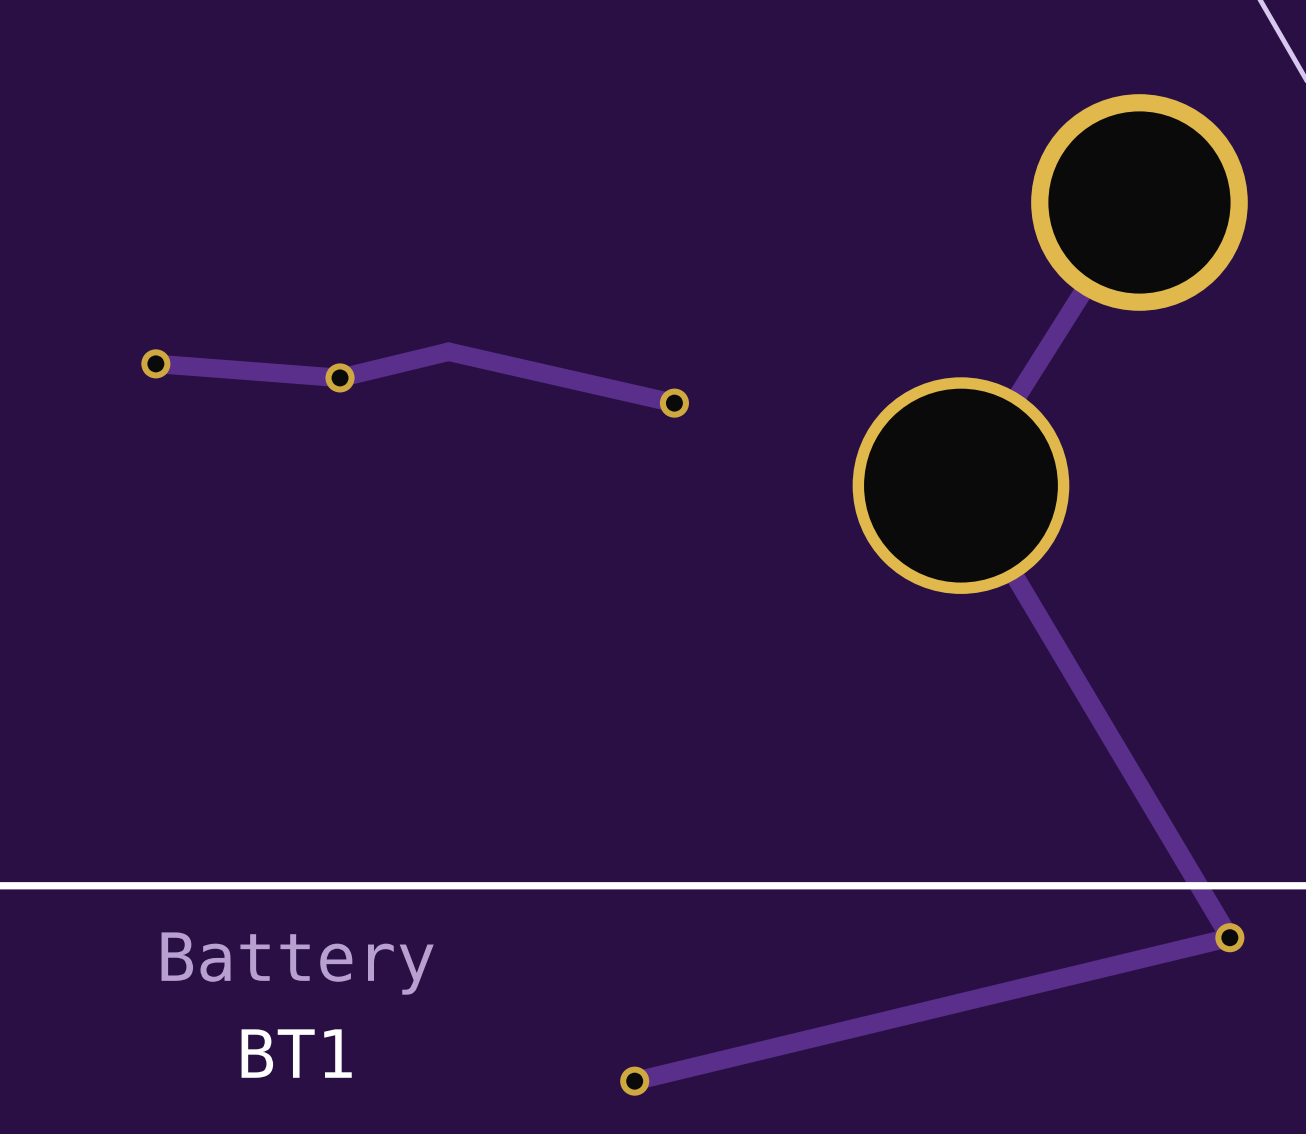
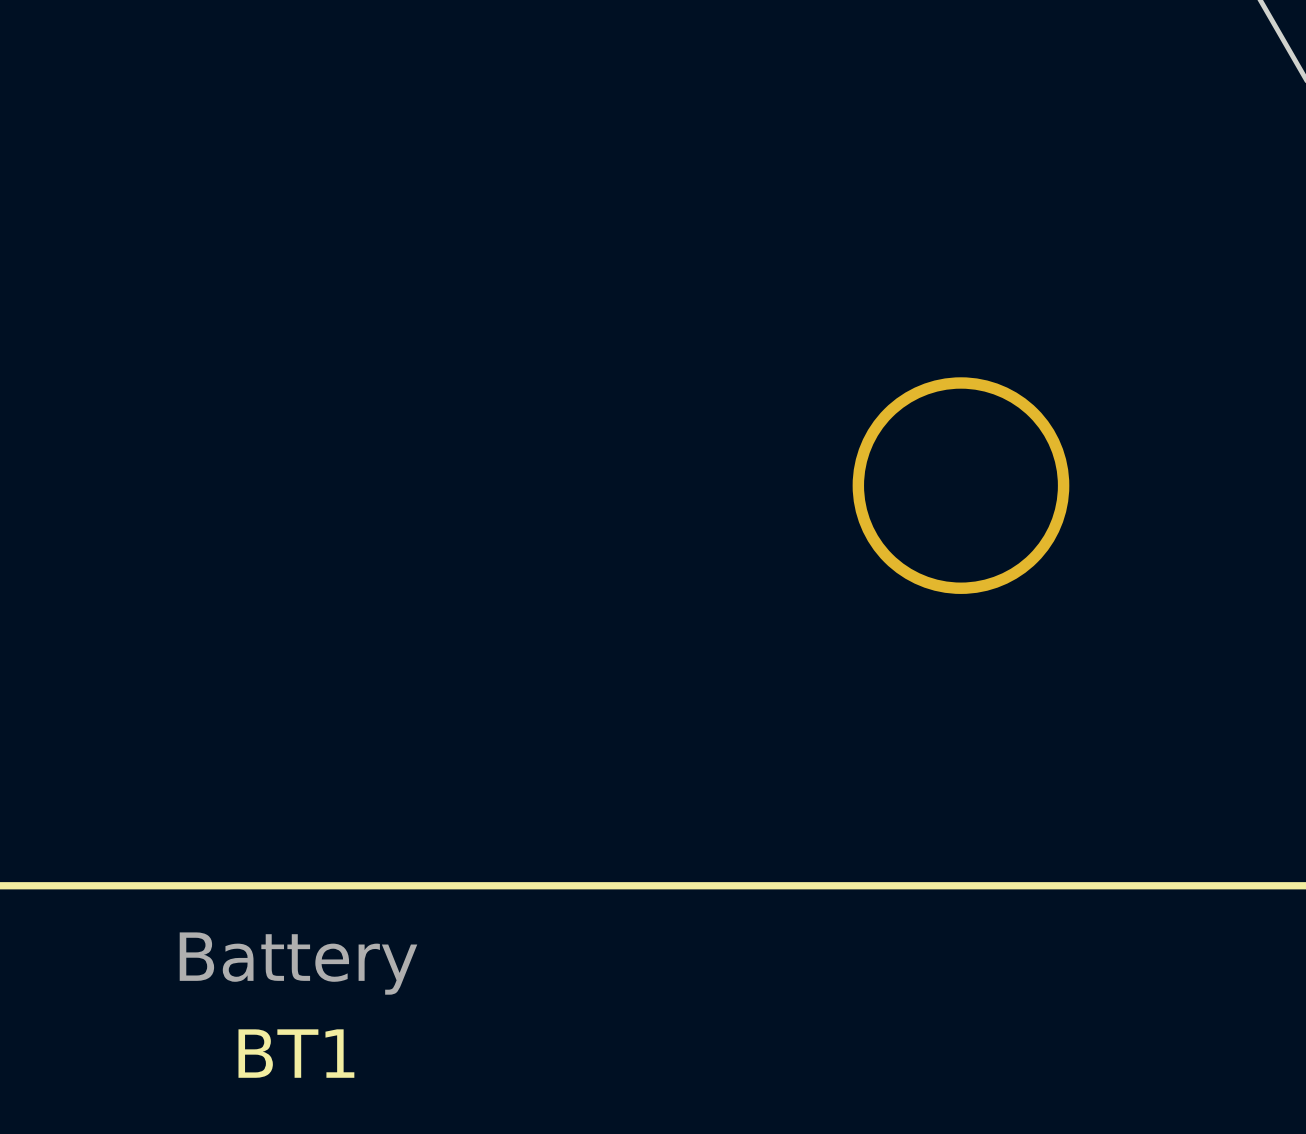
track: (1139, 202) (960, 485) (1229, 937) (634, 1081) -> none
part: (1139, 202) -> none
track: (155, 363) (340, 377) (448, 351) (674, 403) -> none
via: (155, 363) -> none
via: (340, 377) -> none
via: (674, 403) -> none
via: (1229, 937) -> none
via: (634, 1081) -> none

